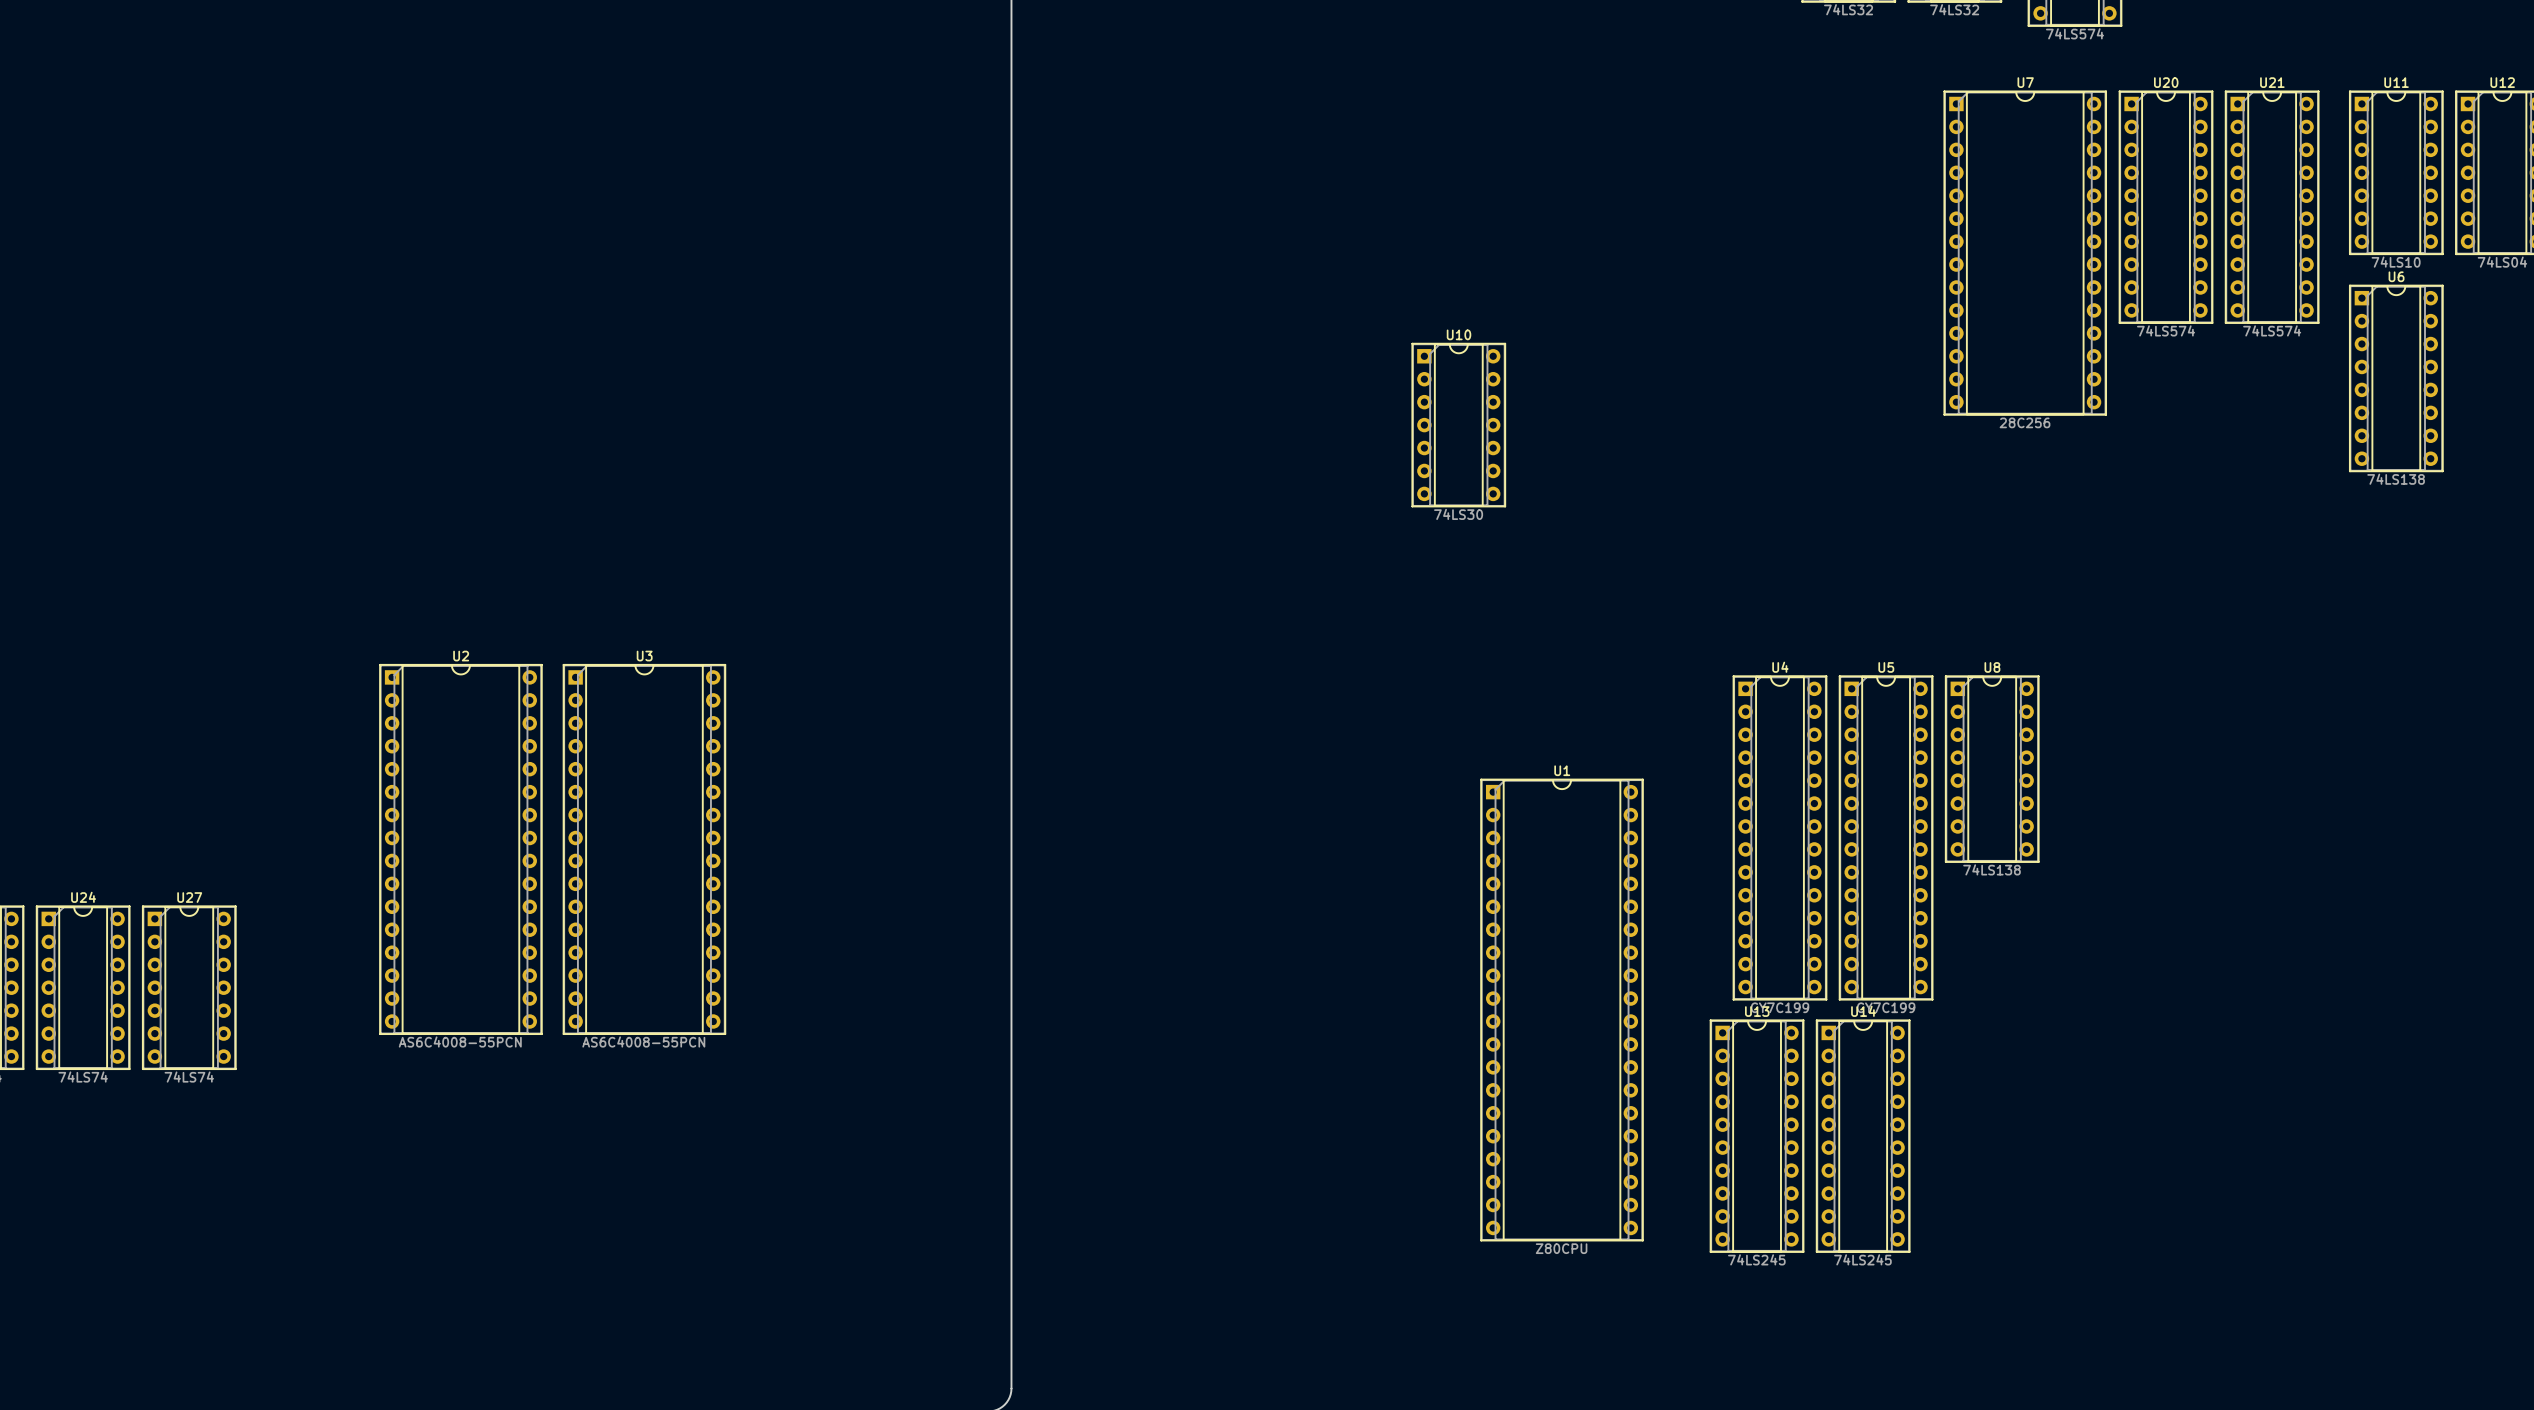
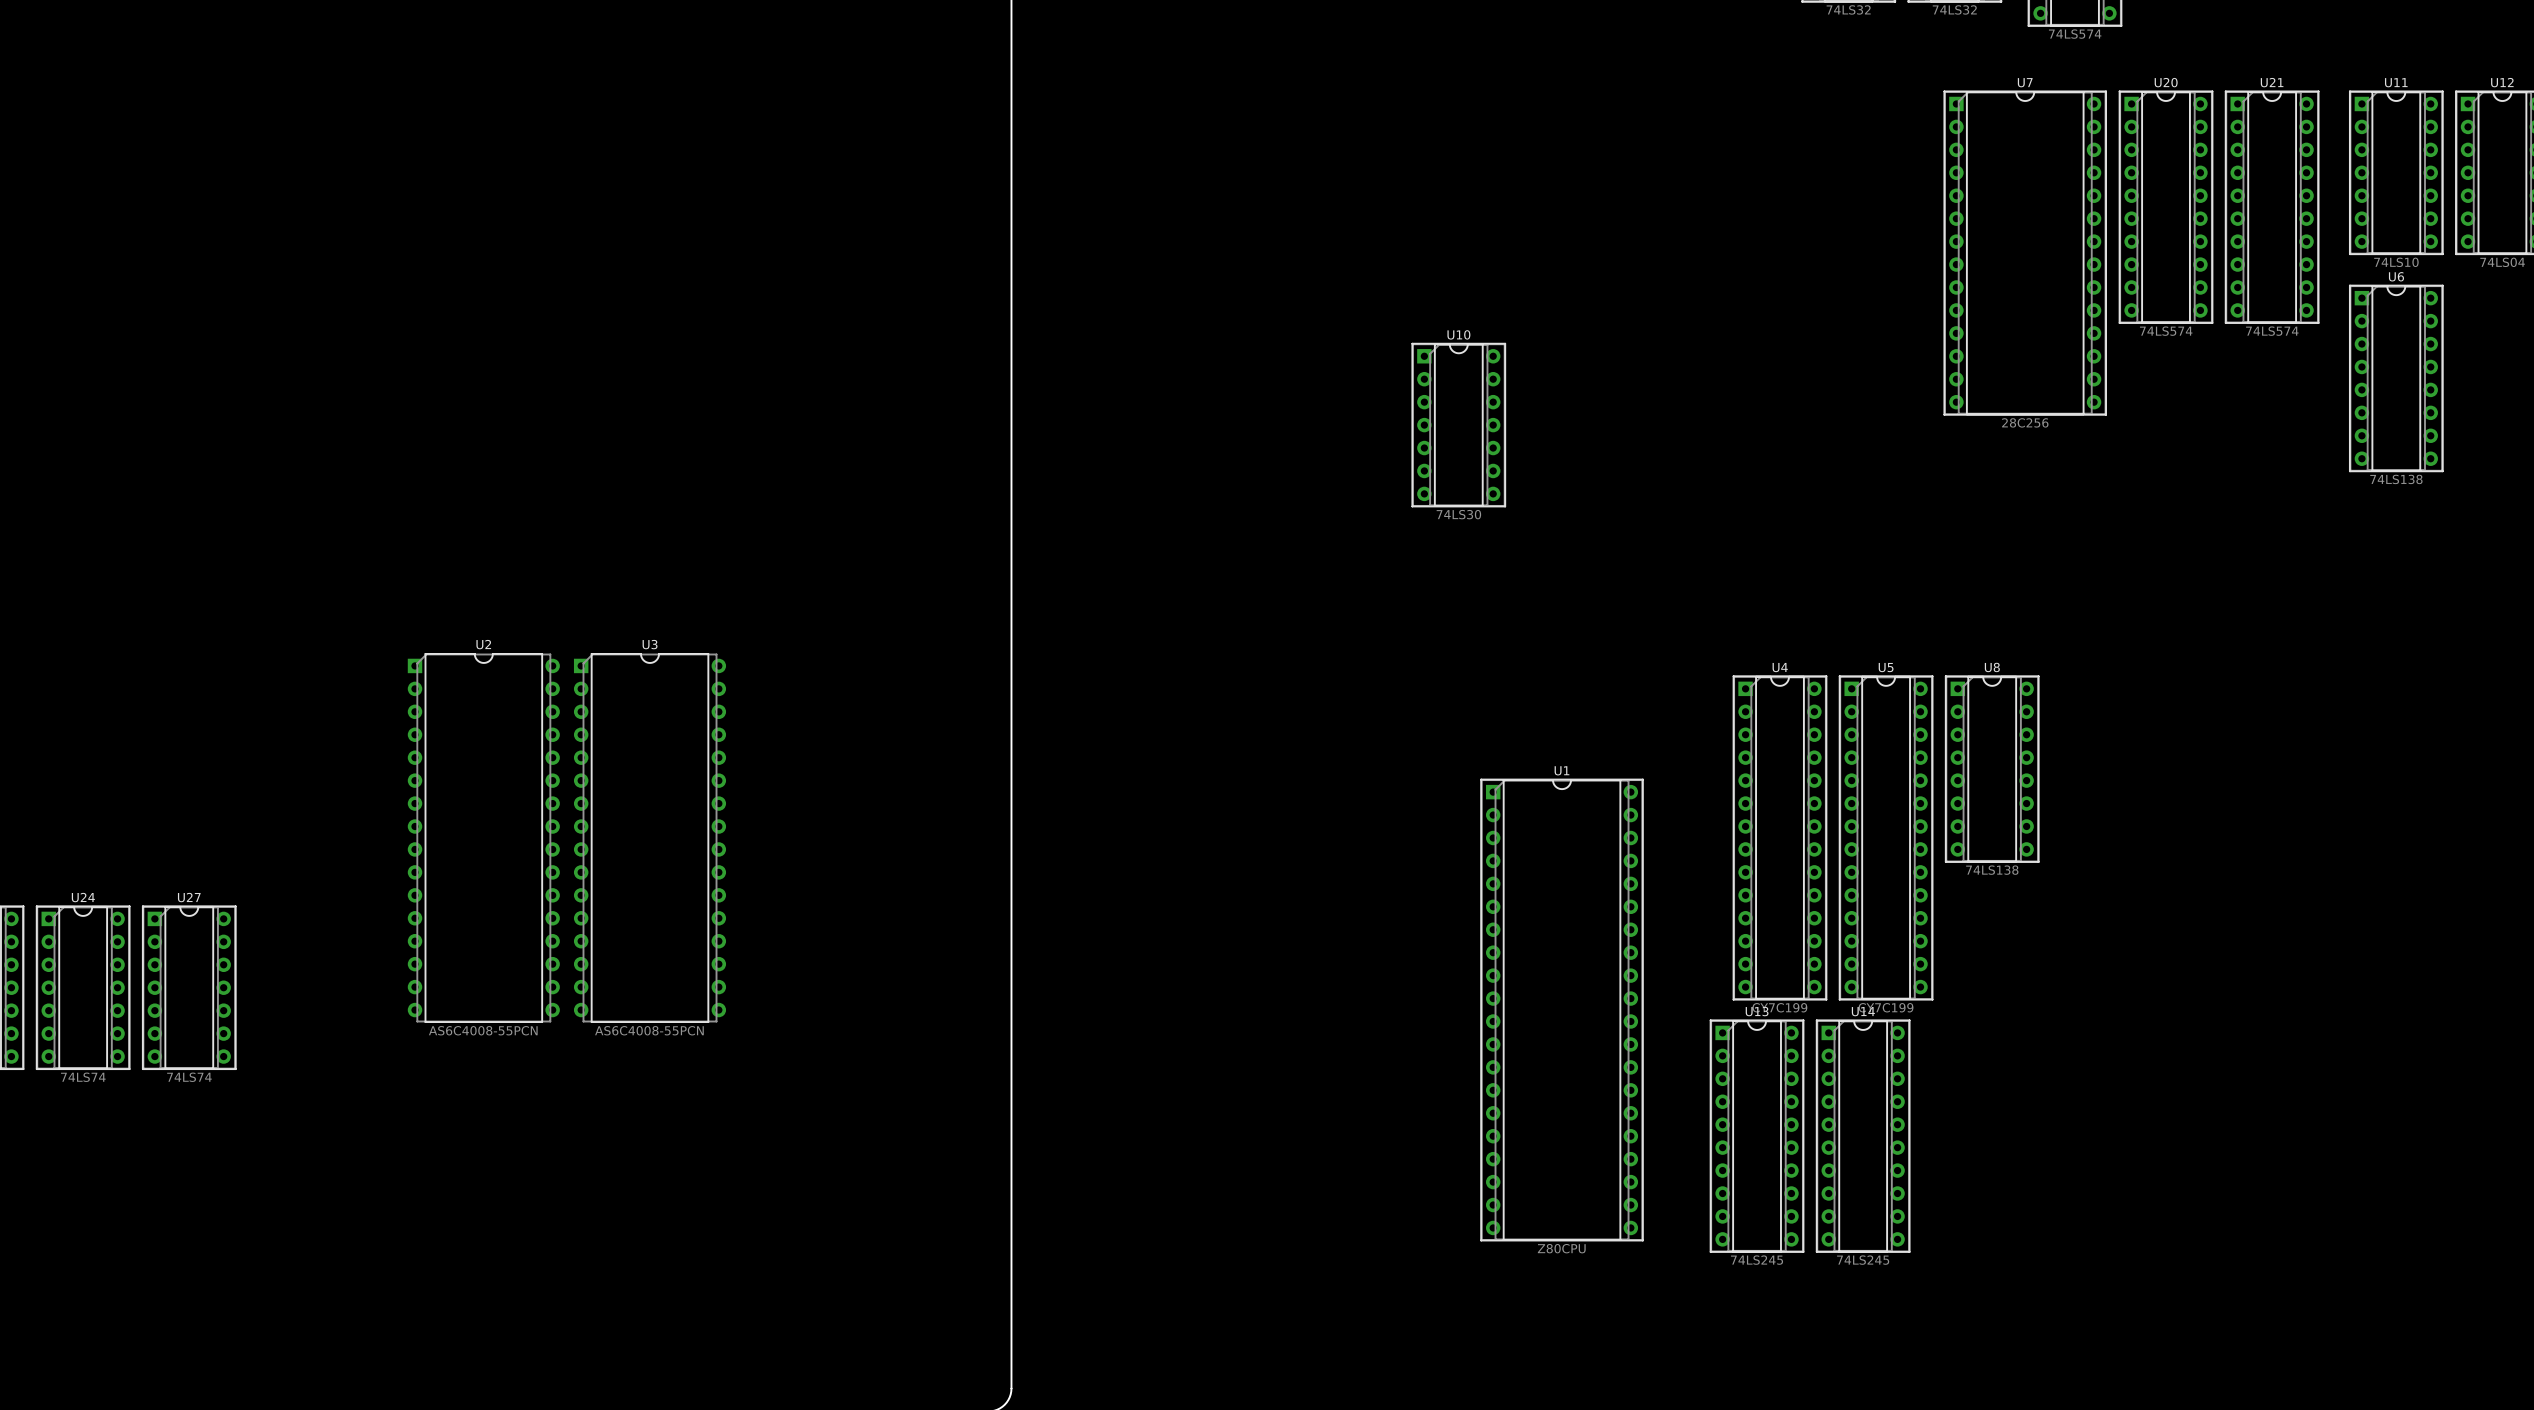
U2 footprint: [379, 664, 543, 1035] -> [407, 653, 560, 1023]
U3 footprint: [563, 664, 726, 1035] -> [573, 653, 727, 1023]

